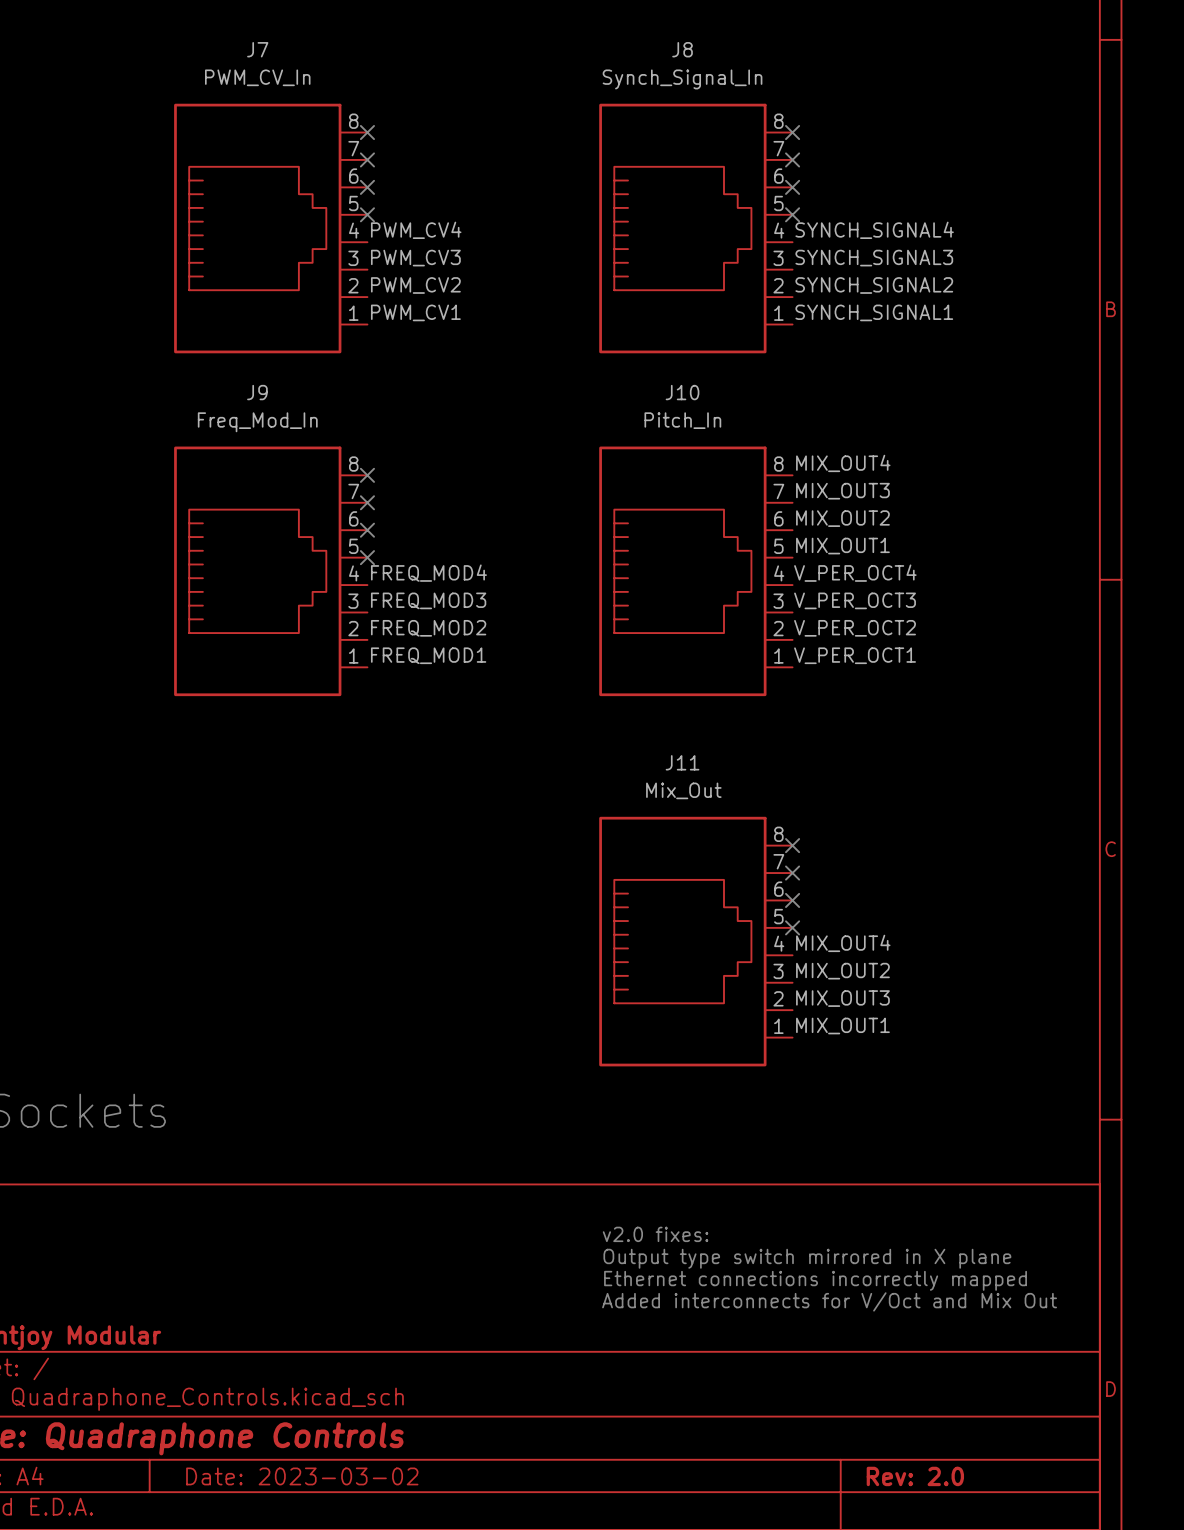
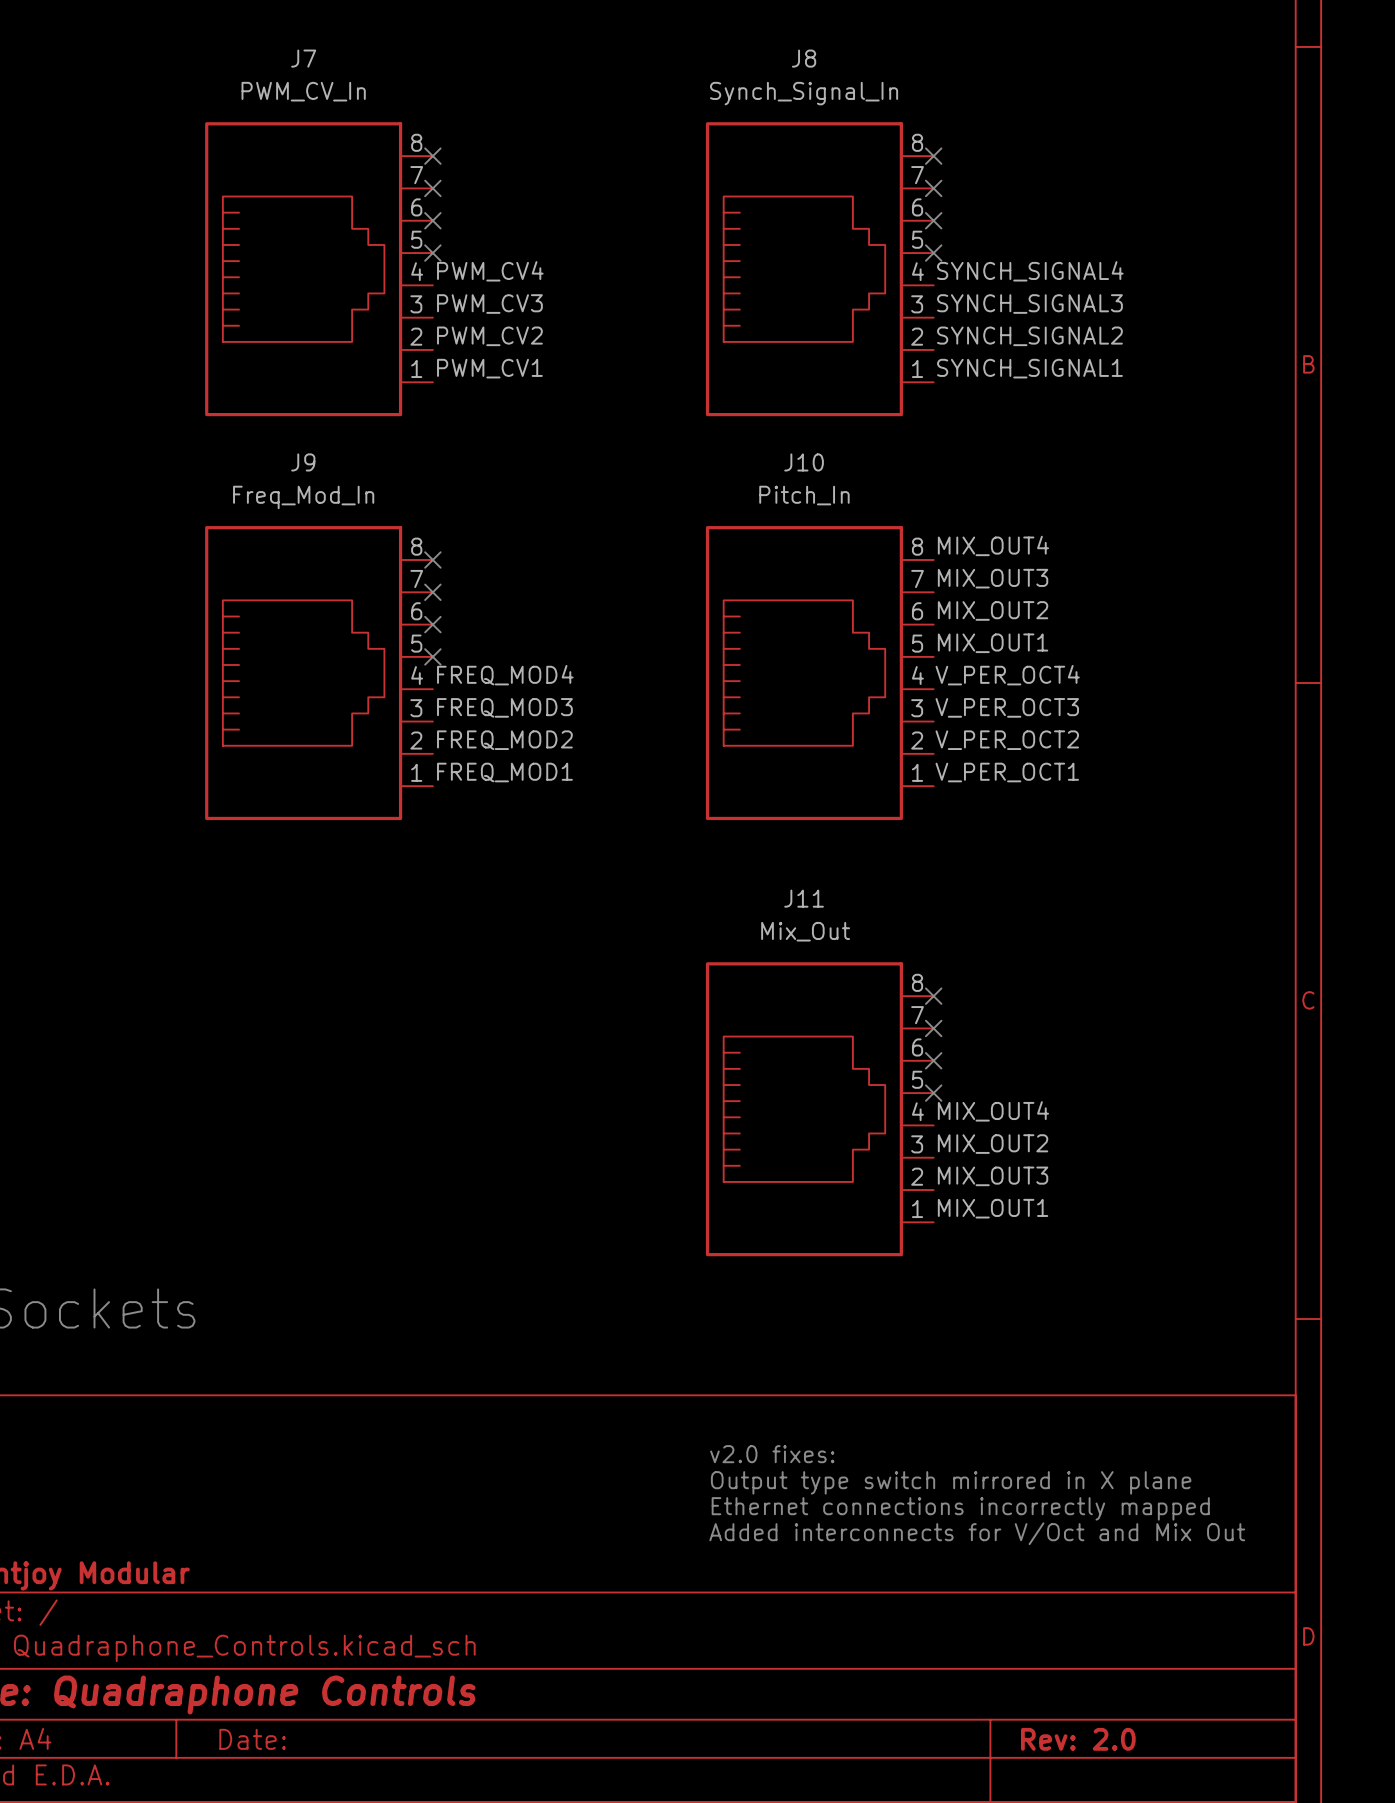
title block: Date: 2023-03-02 (302, 1476) -> Date: (252, 1739)

